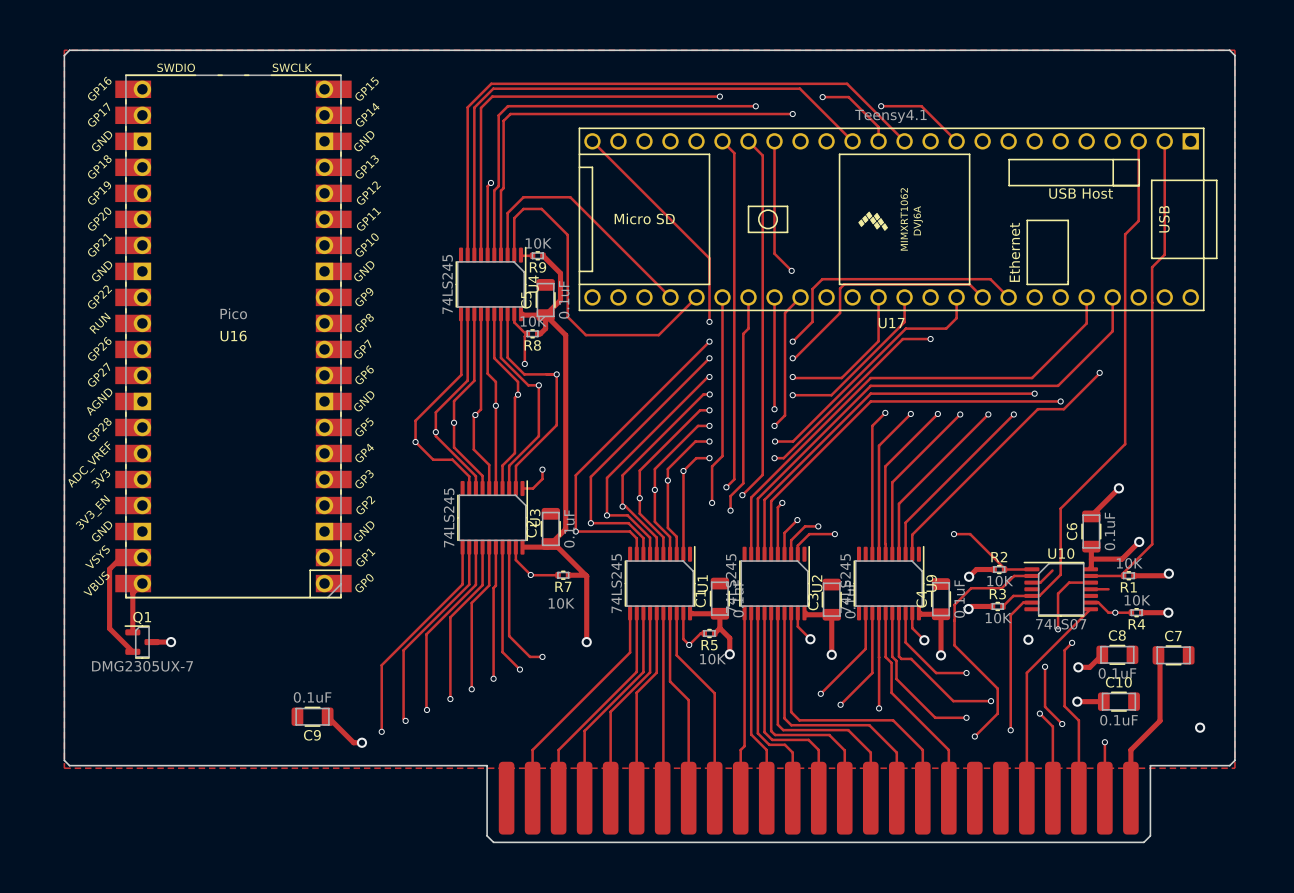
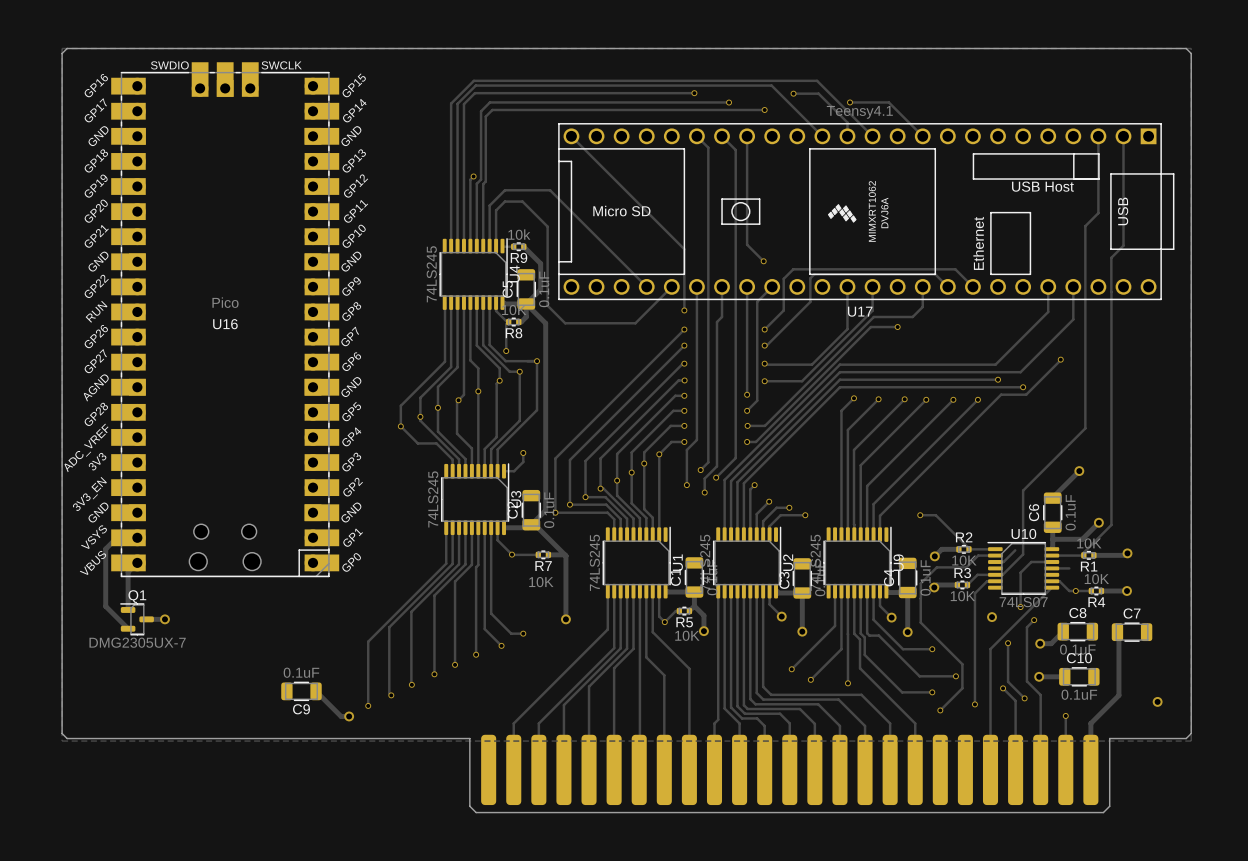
U16 footprint: [115, 74, 352, 599] -> [111, 62, 340, 578]
R9 value: 10K (538, 243) -> 10k (519, 234)

